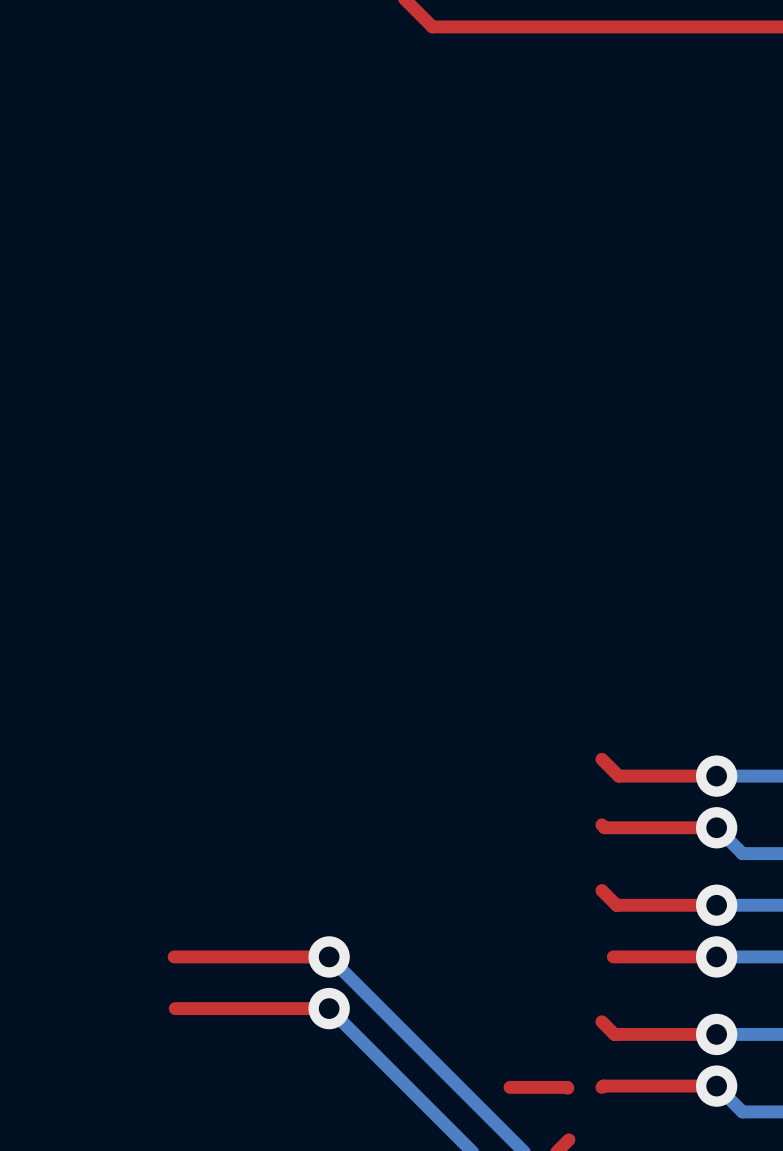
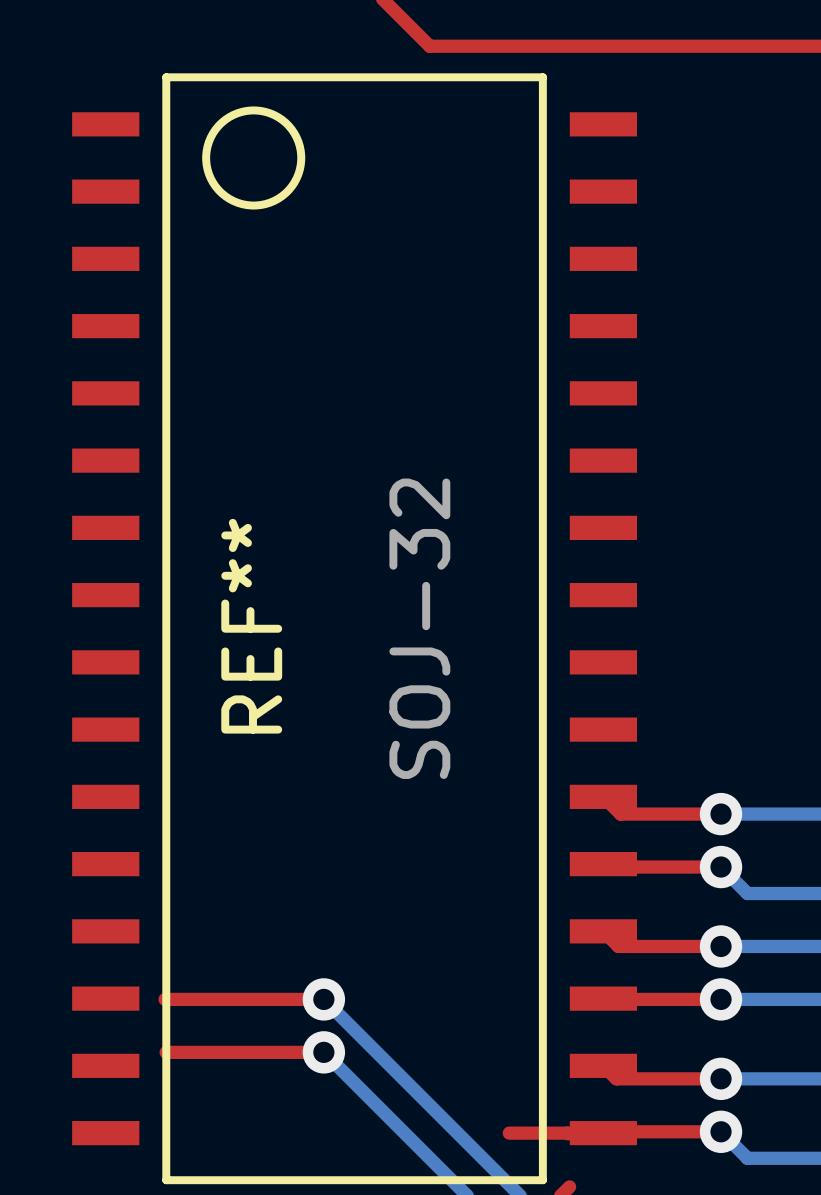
REF**: none -> SOJ-32 (354, 628)

